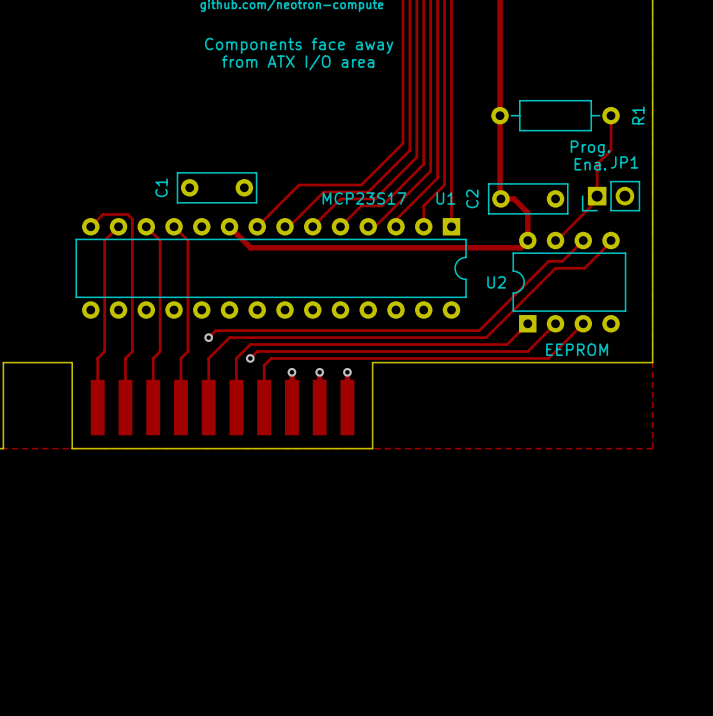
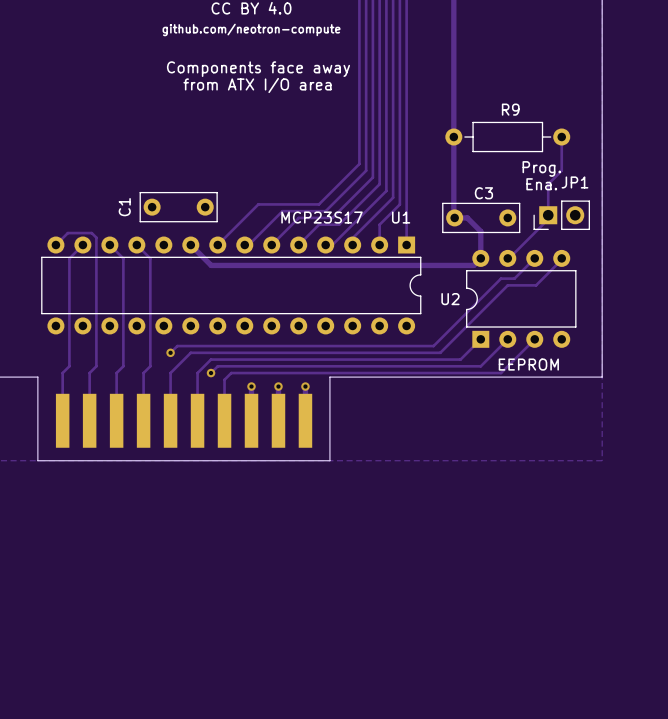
R1 name: R1 (638, 115) -> R9 (510, 109)
C2 name: C2 (472, 198) -> C3 (483, 193)

